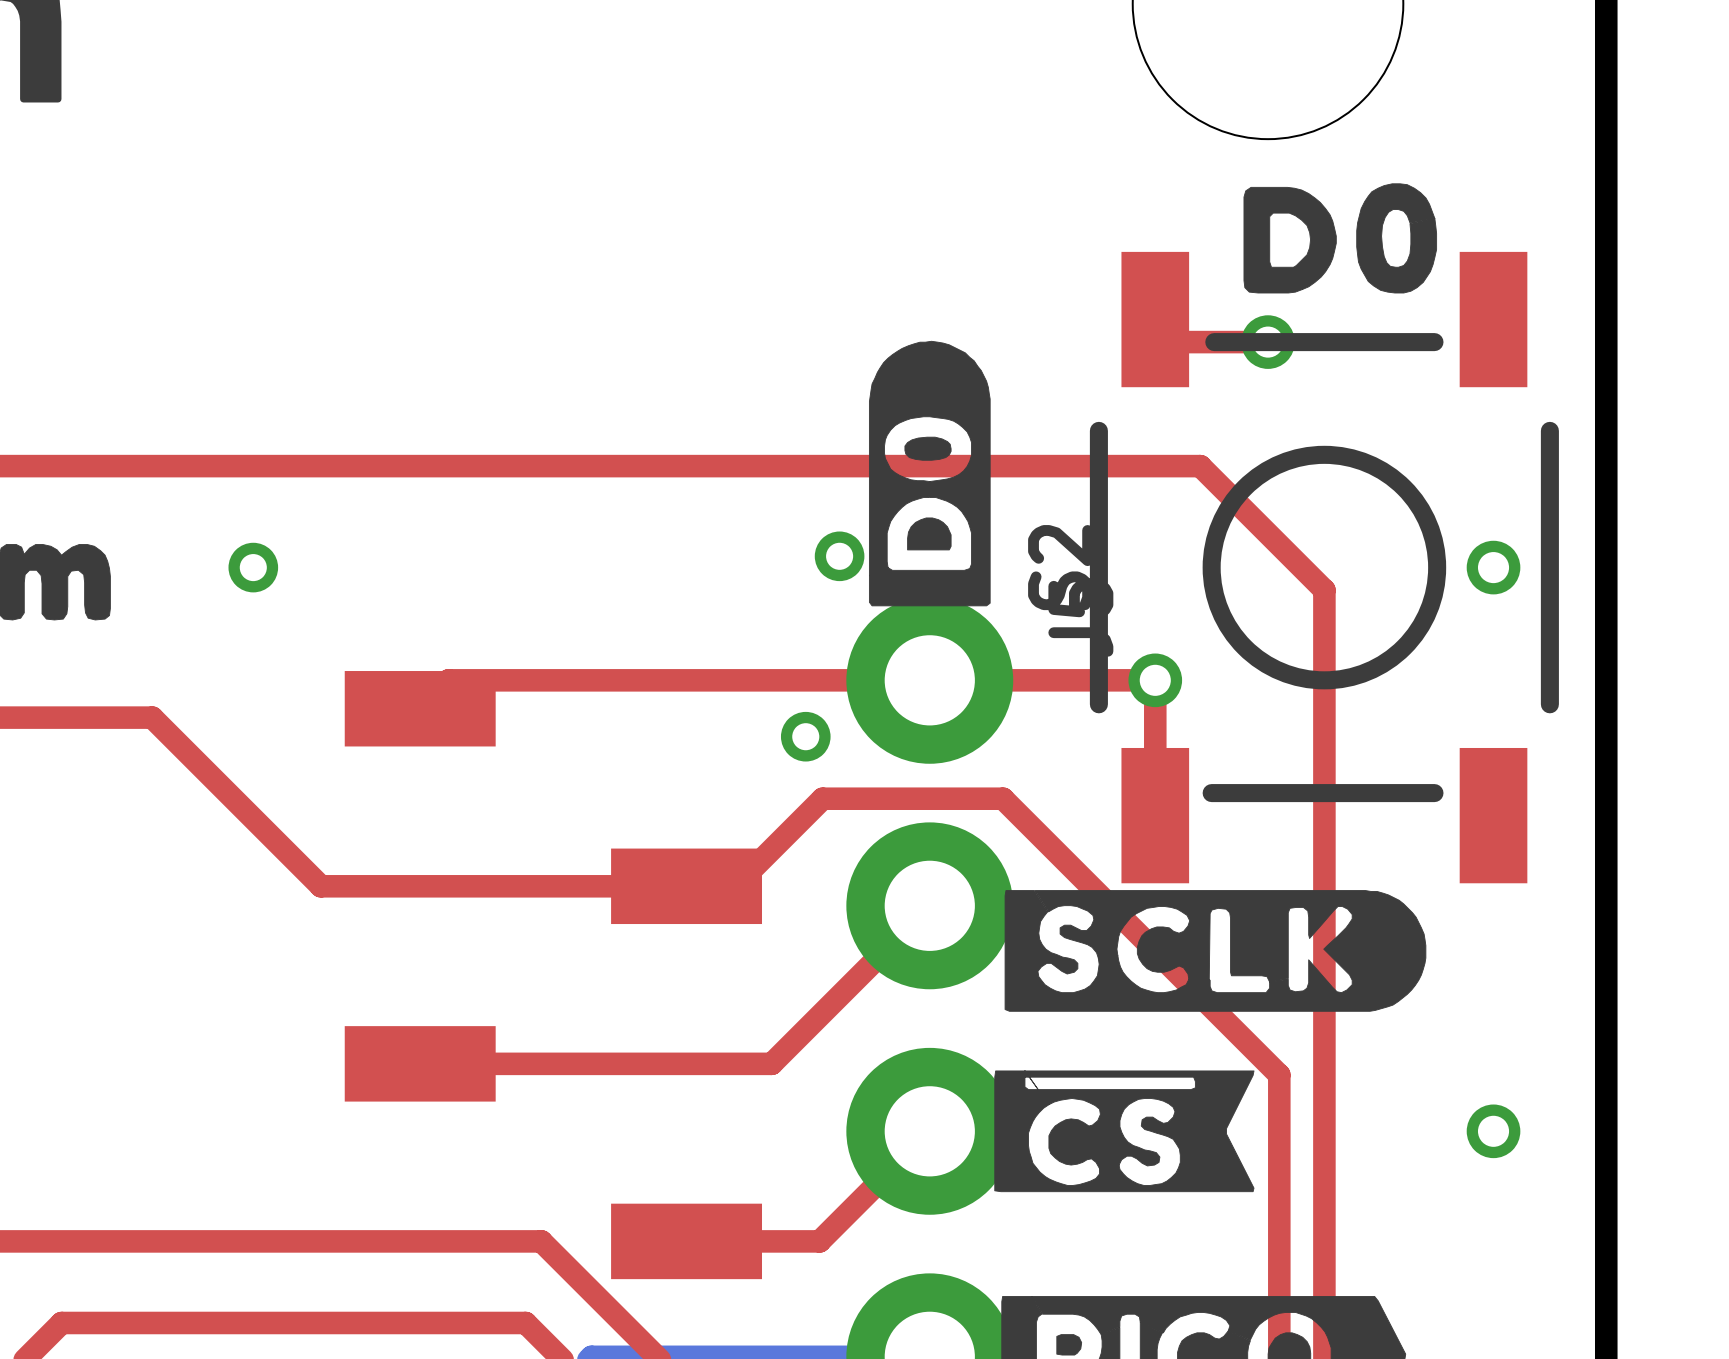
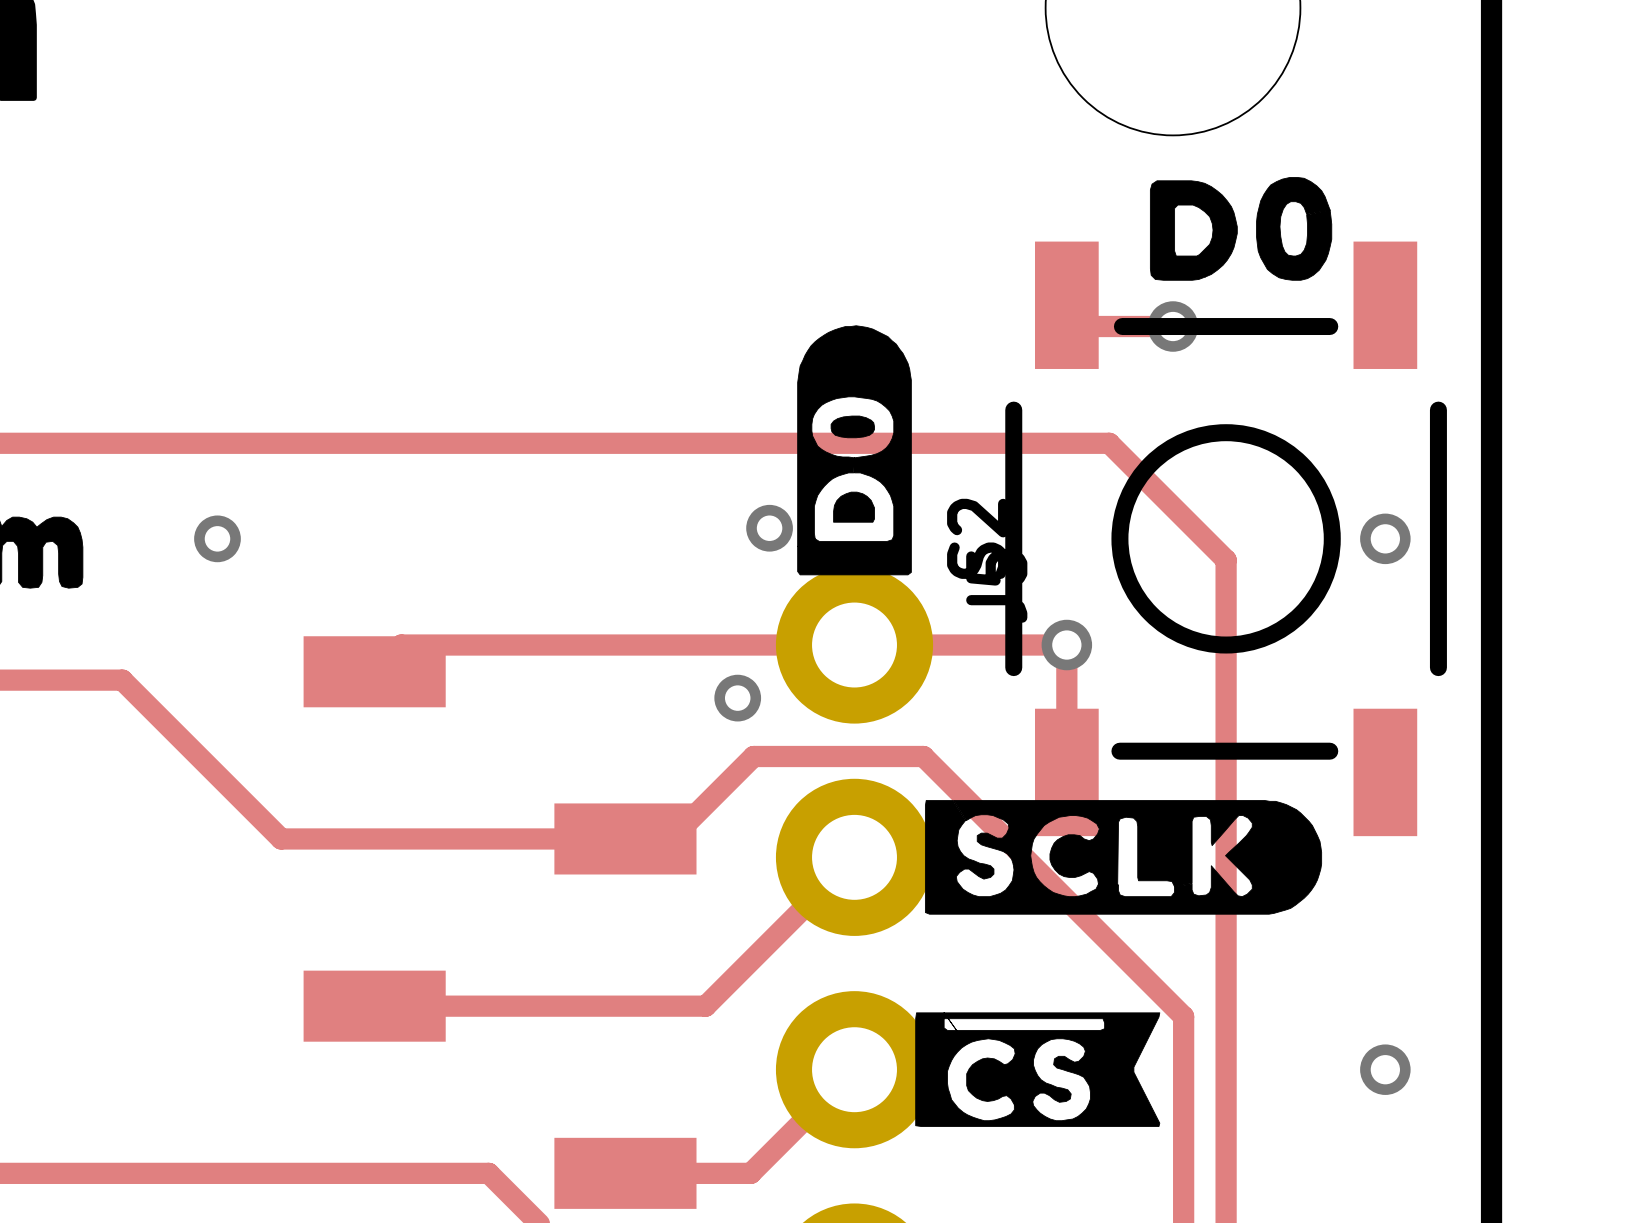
drawing position: (1215, 950) -> (1123, 857)

